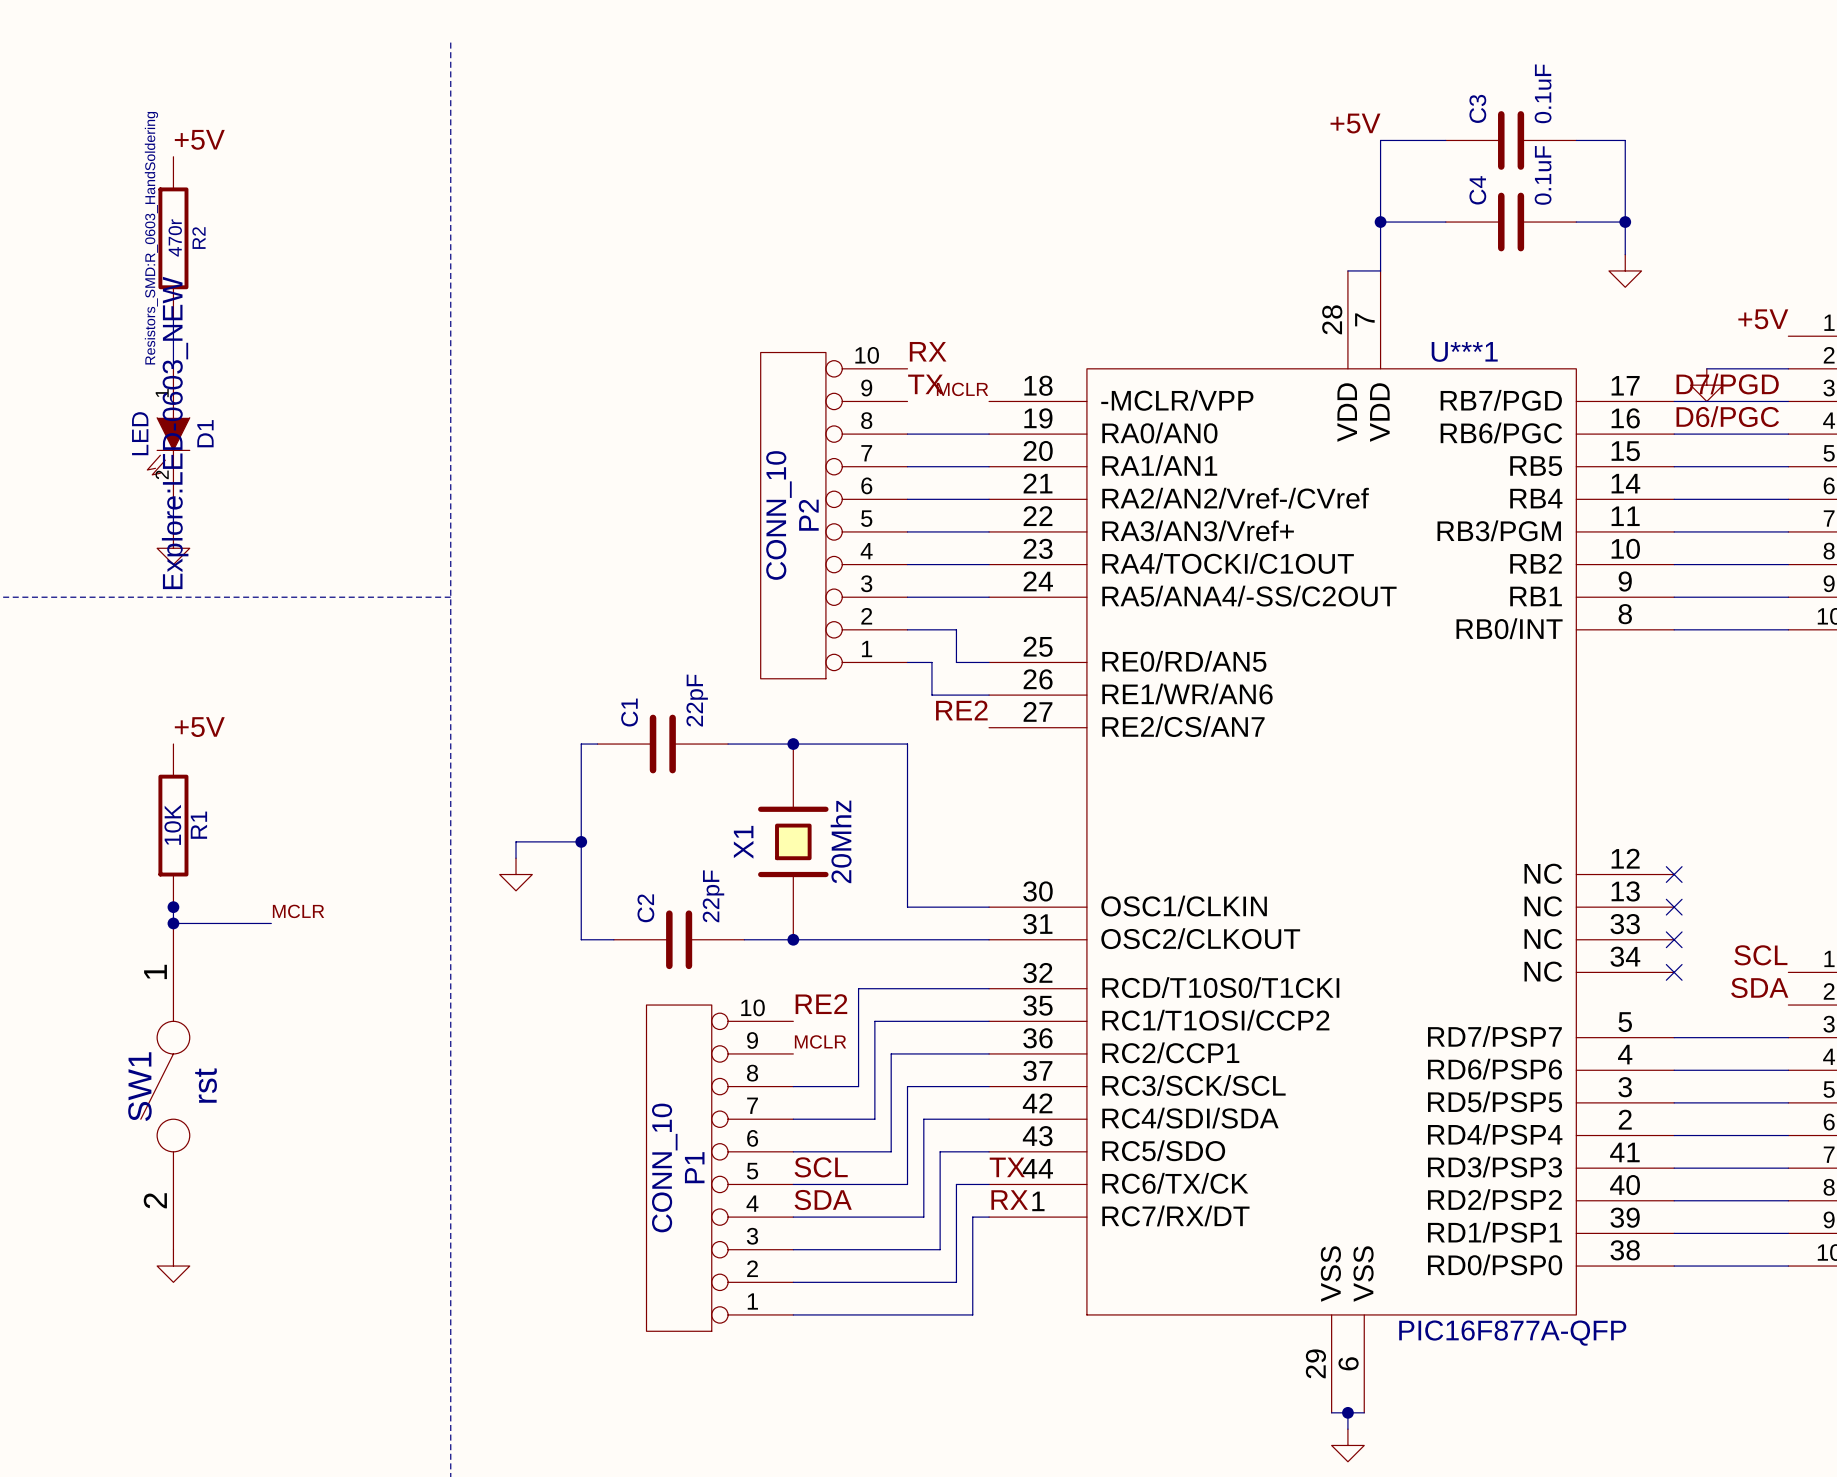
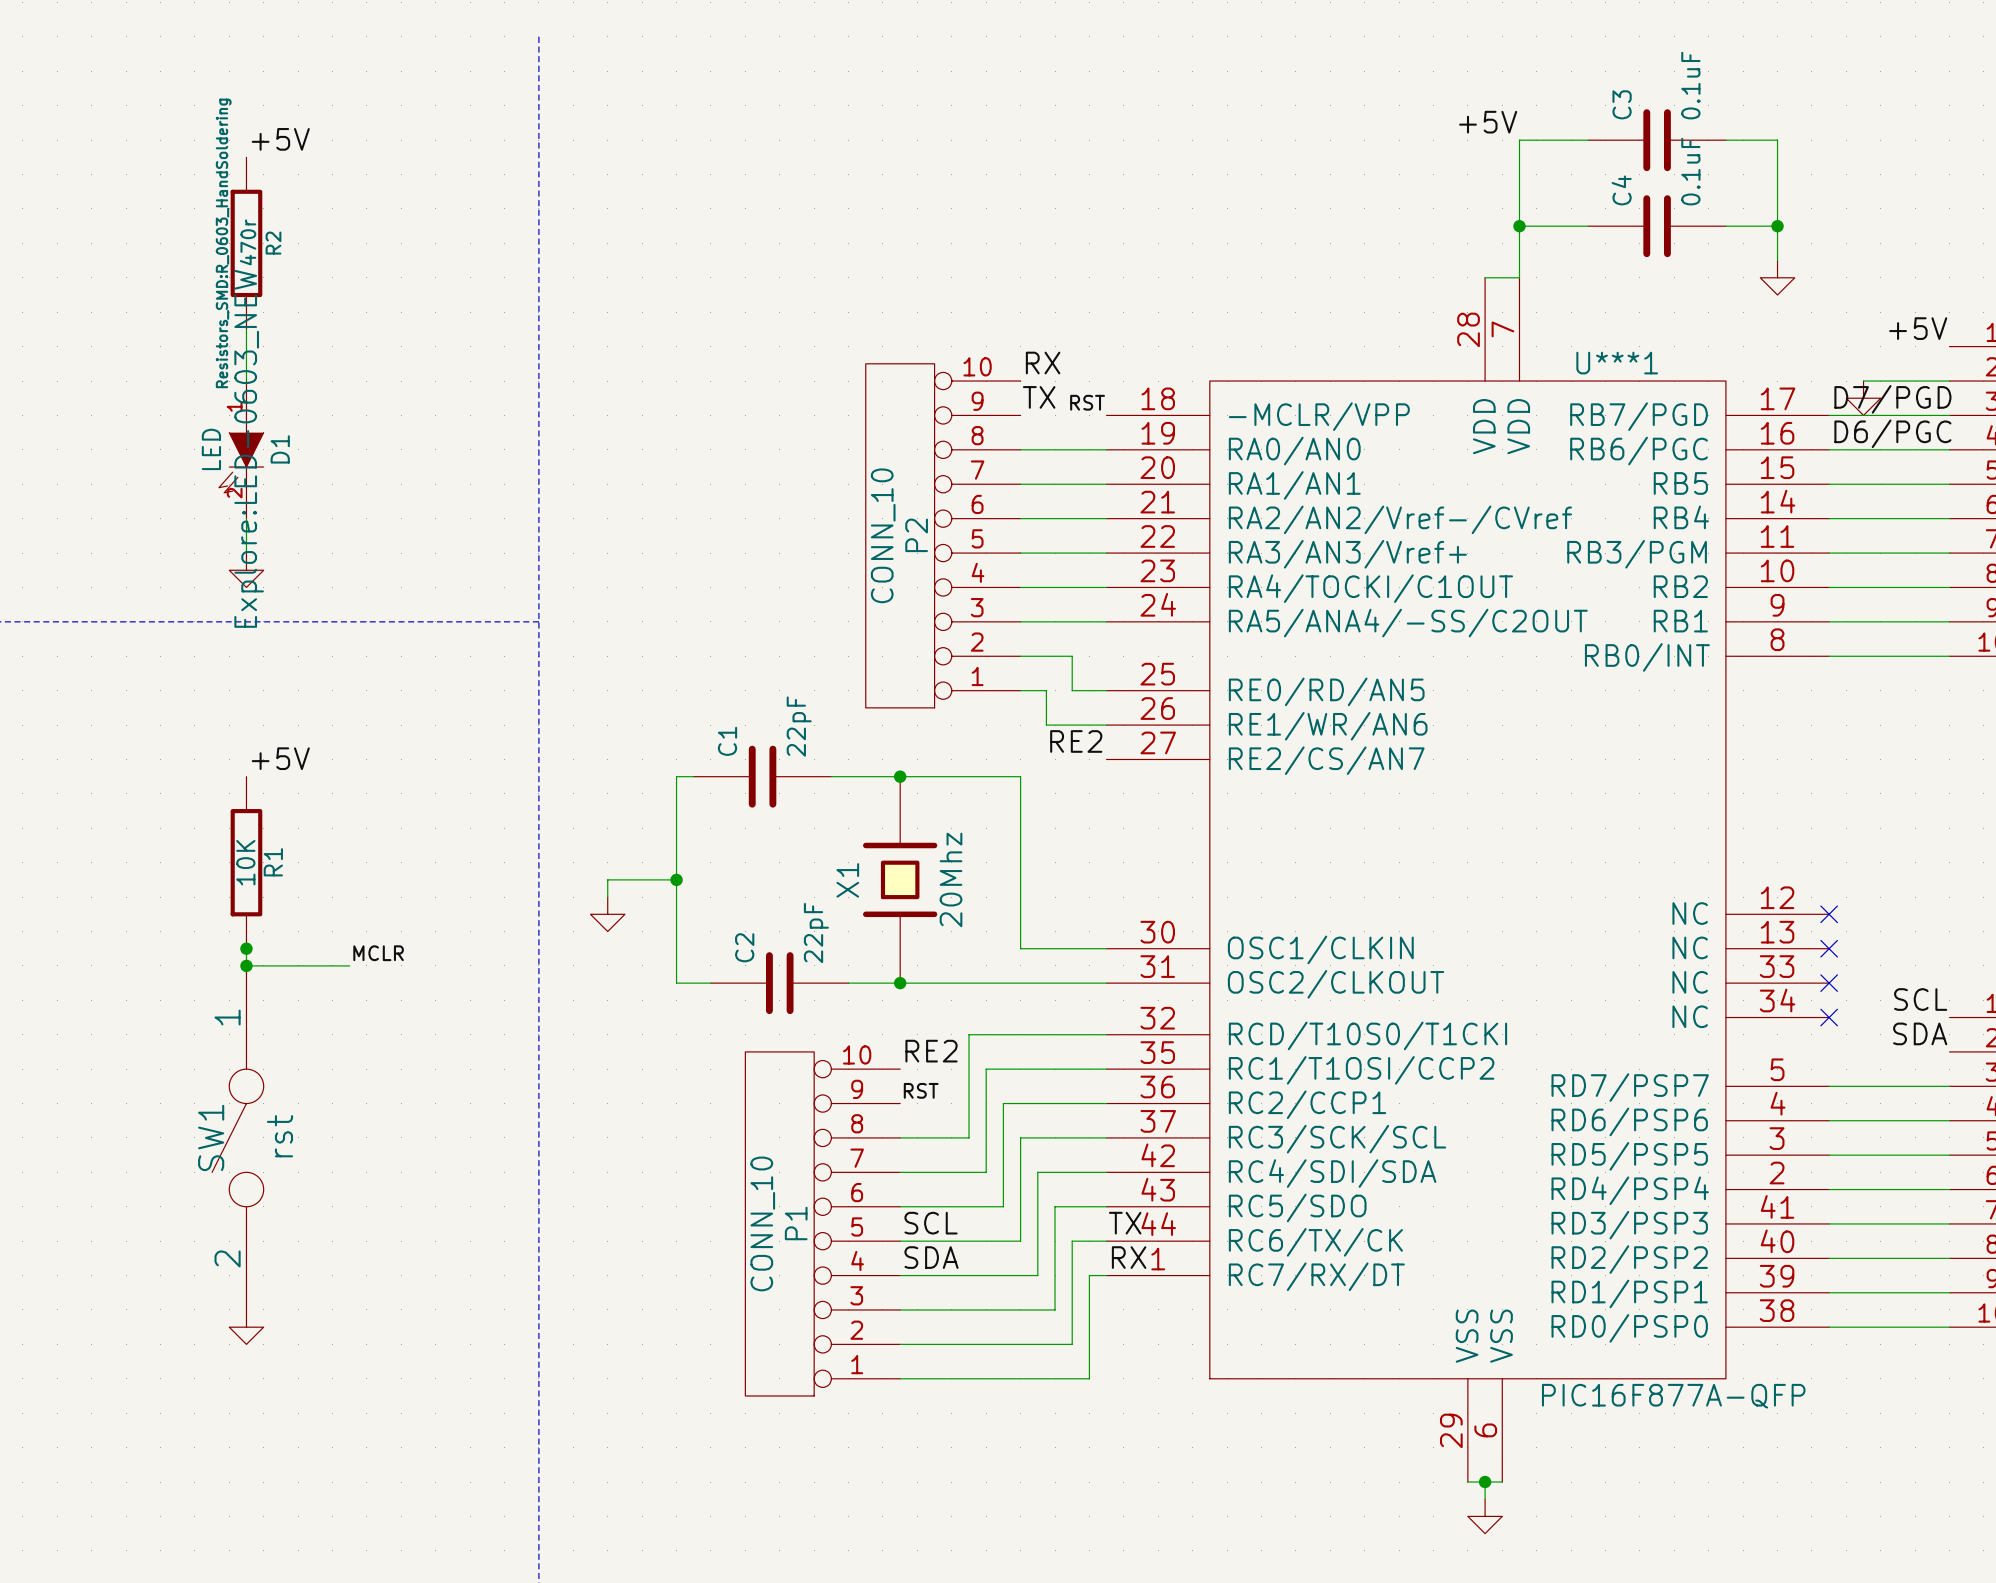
label: MCLR (962, 389) -> RST (1087, 402)
label: MCLR (820, 1041) -> RST (921, 1090)

